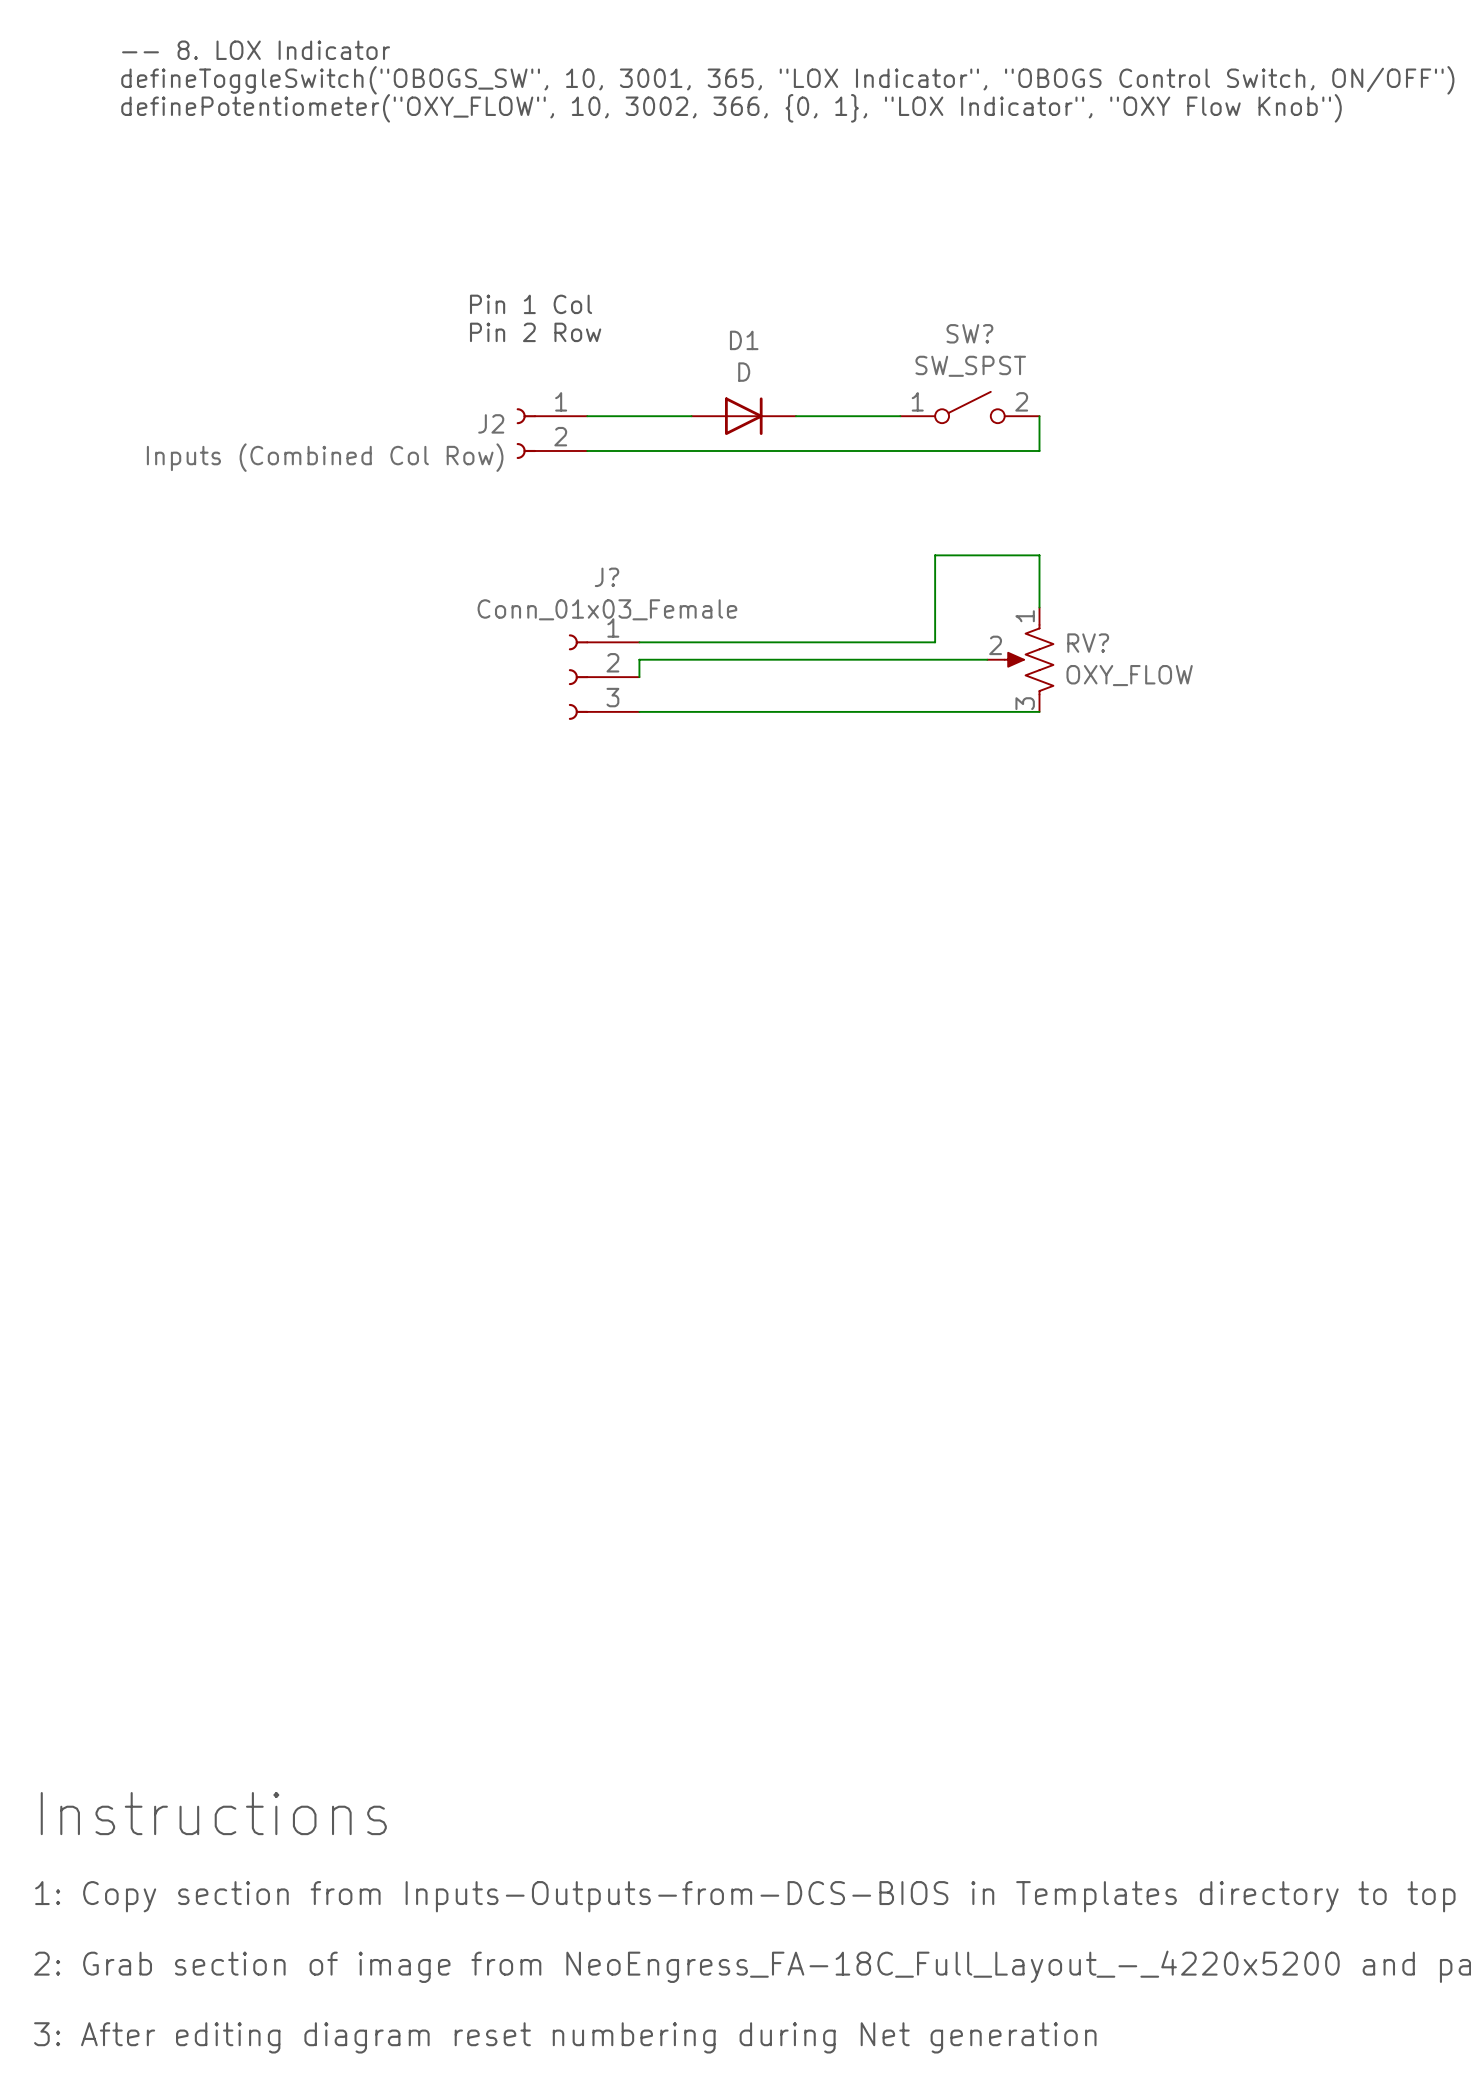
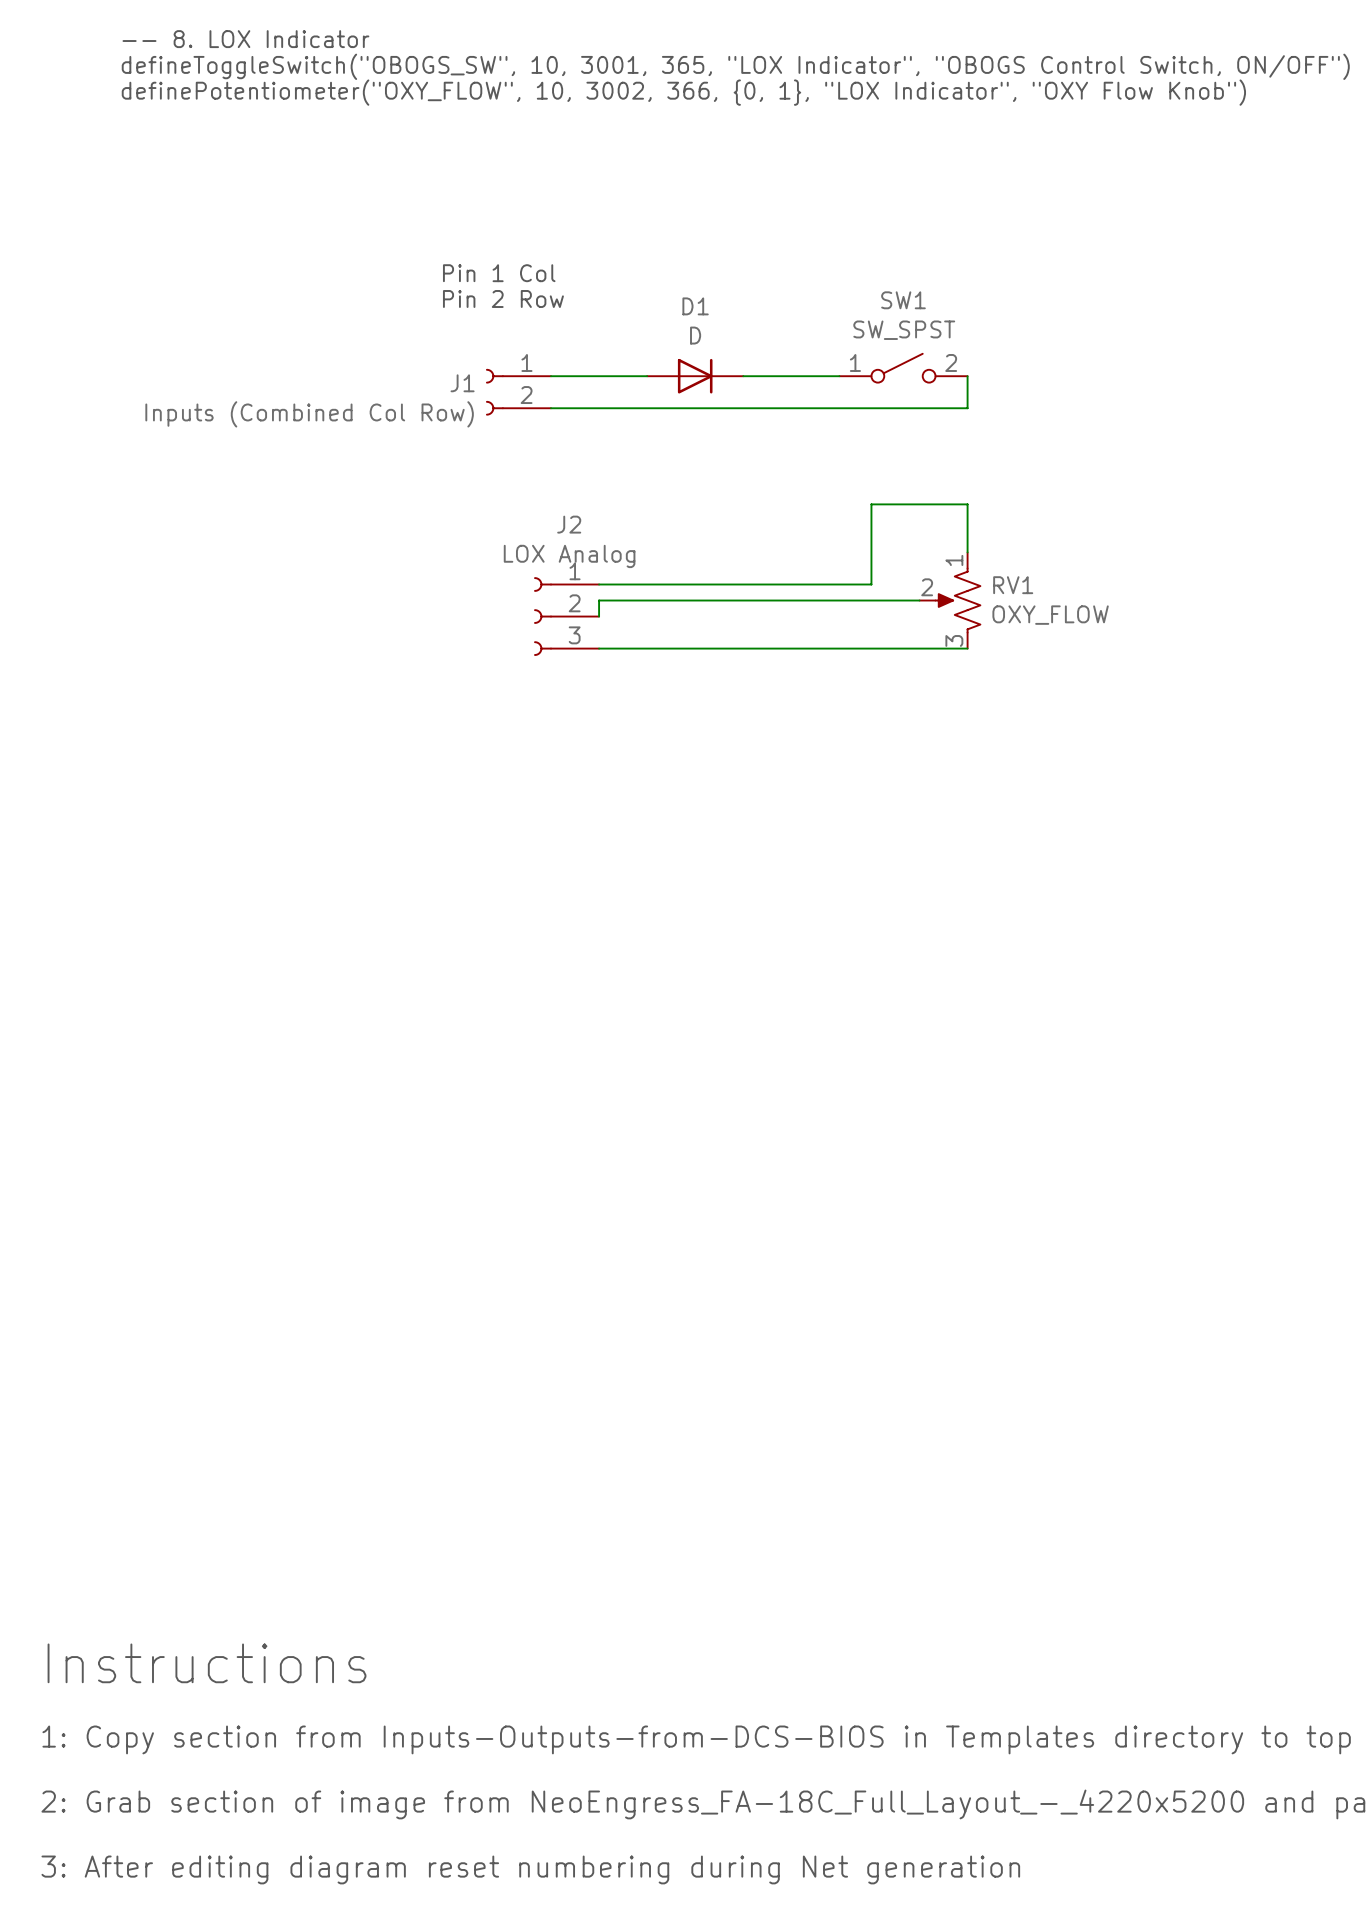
SW? name: SW? (969, 333) -> SW1 (903, 300)
J2 name: J2 (491, 423) -> J1 (462, 383)
J? name: J? (607, 577) -> J2 (569, 524)
J? value: Conn_01x03_Female (607, 609) -> LOX Analog (569, 556)
RV? name: RV? (1088, 643) -> RV1 (1013, 585)

